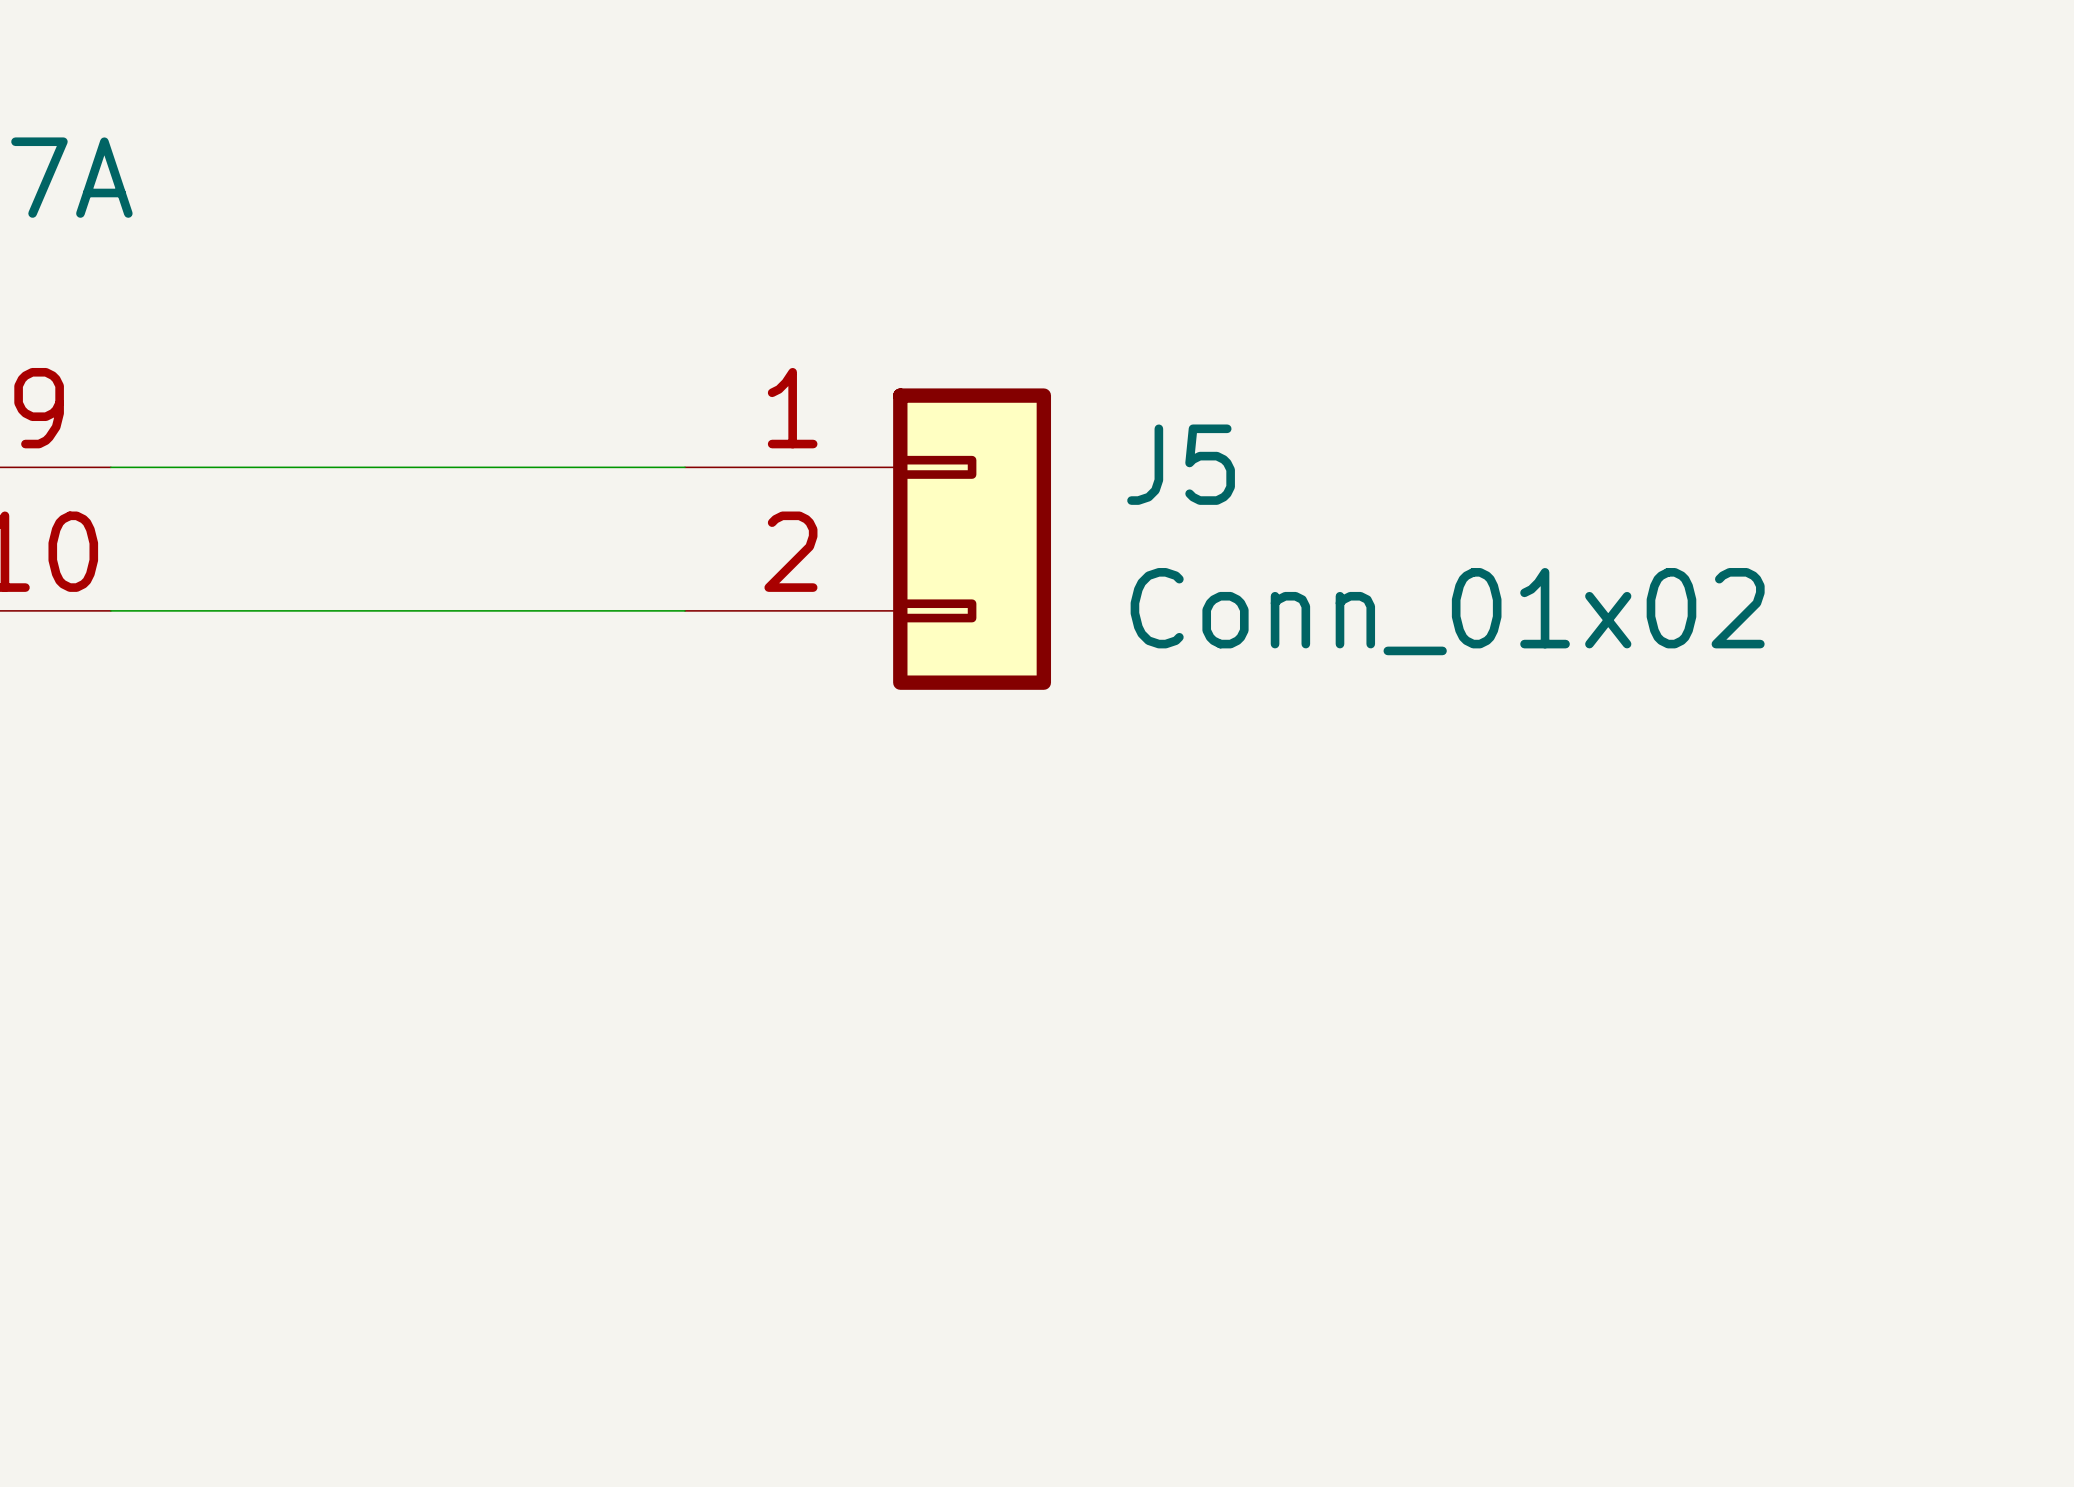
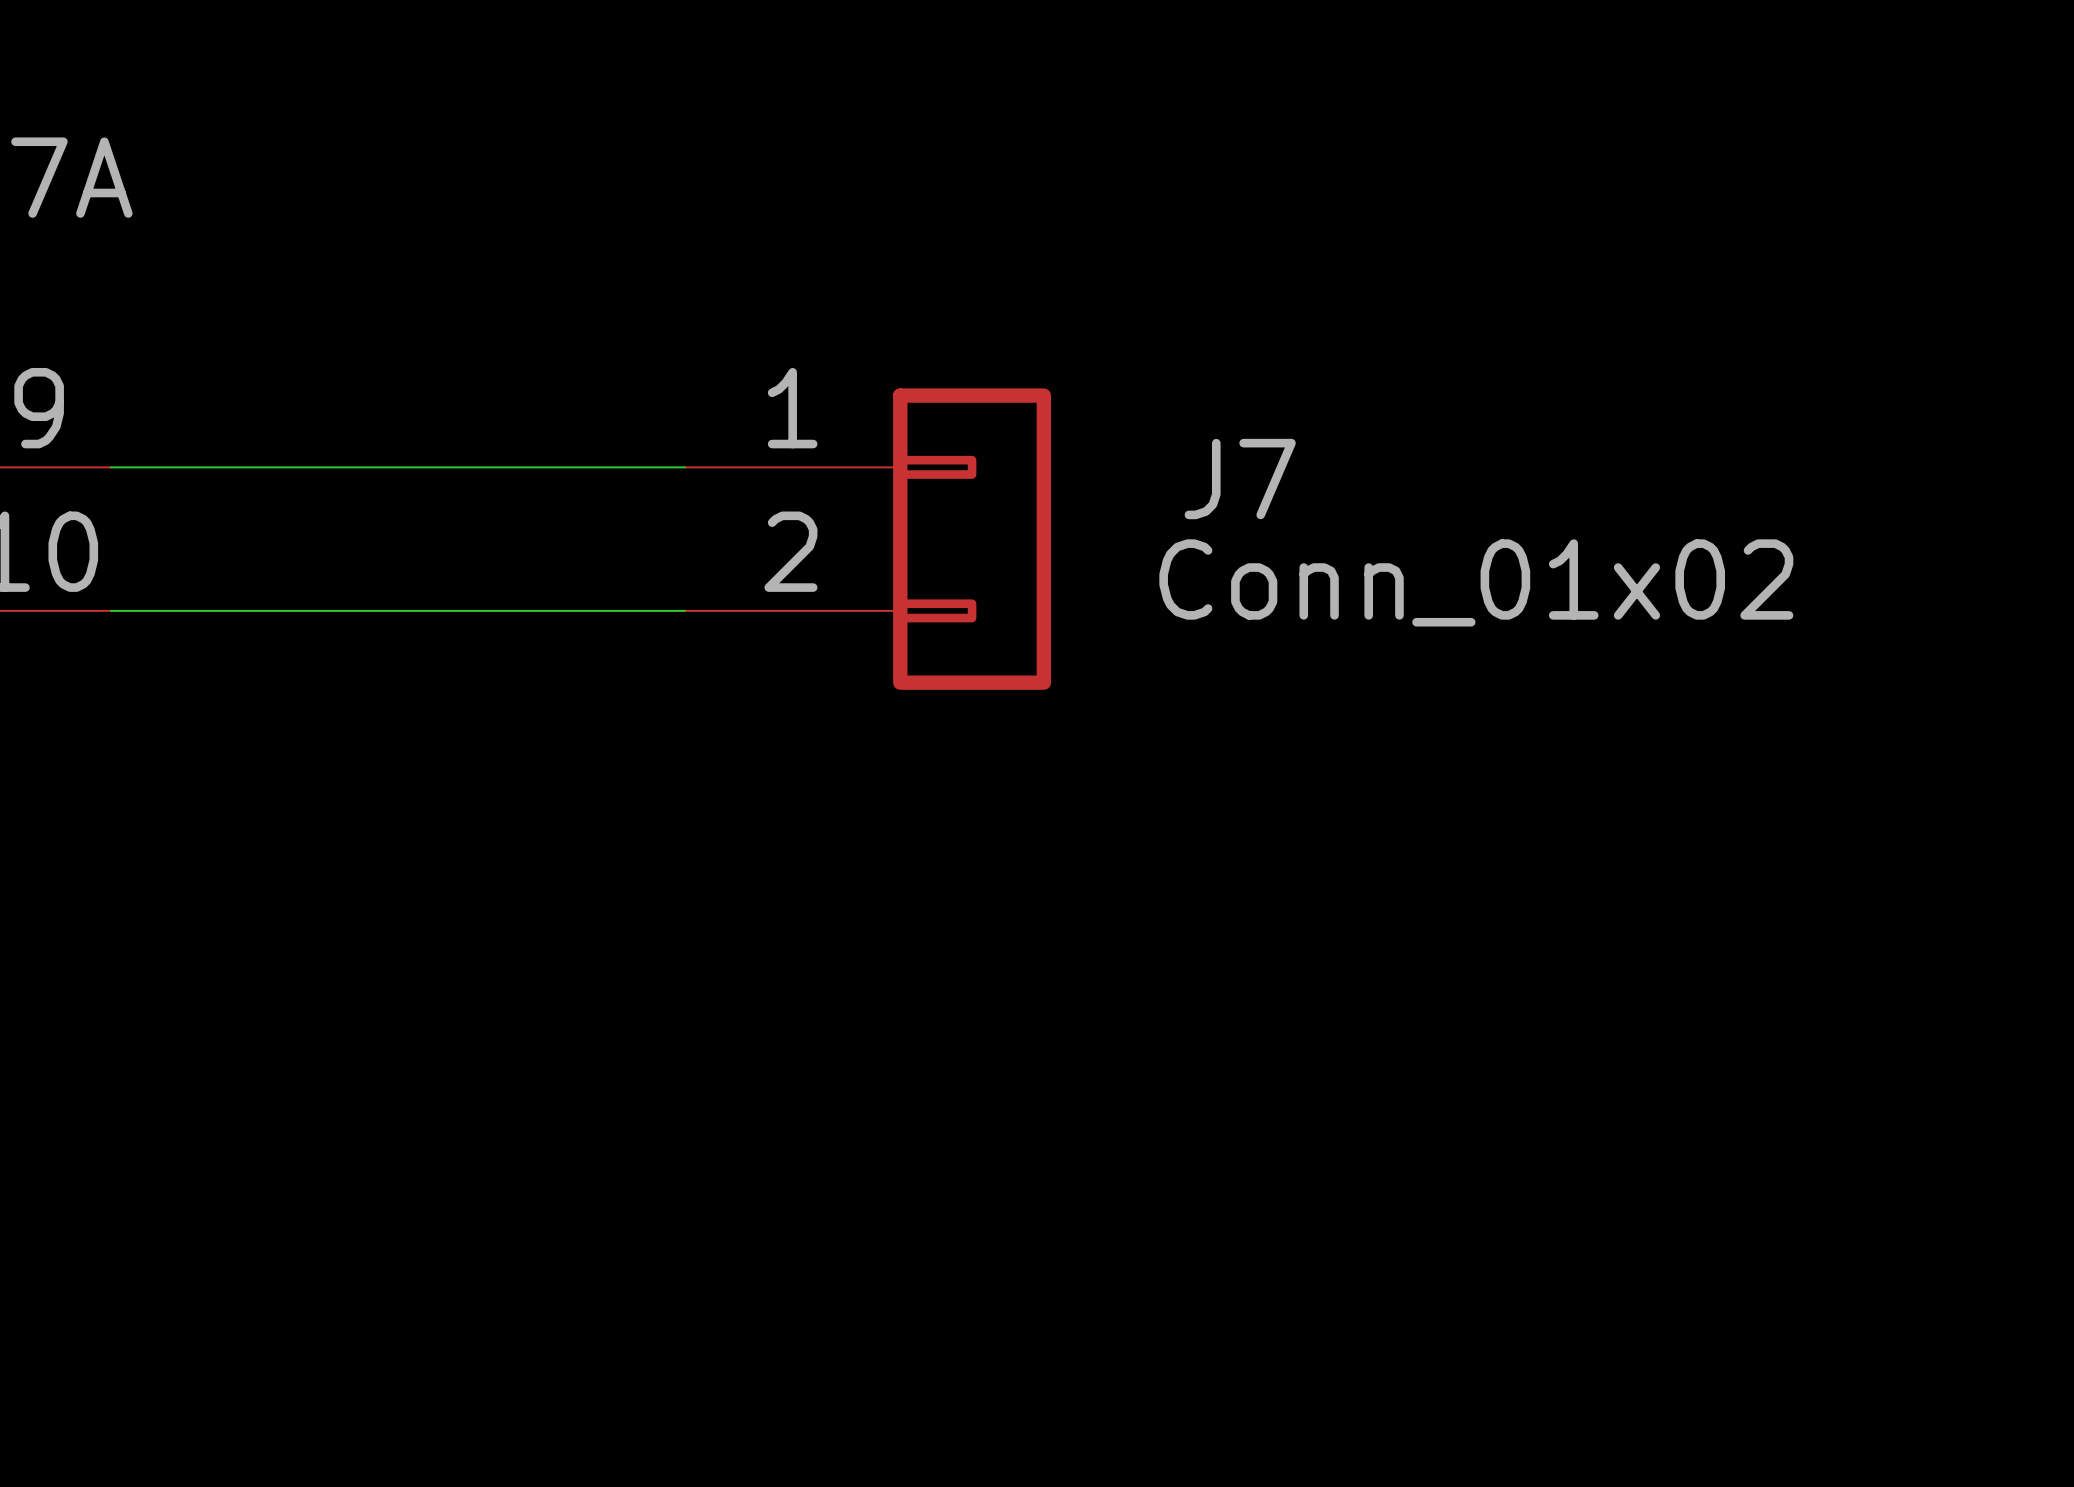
J5 name: J5 (1181, 464) -> J7 (1240, 479)
J5 value position: Conn_01x02 (1447, 611) -> Conn_01x02 (1476, 582)

